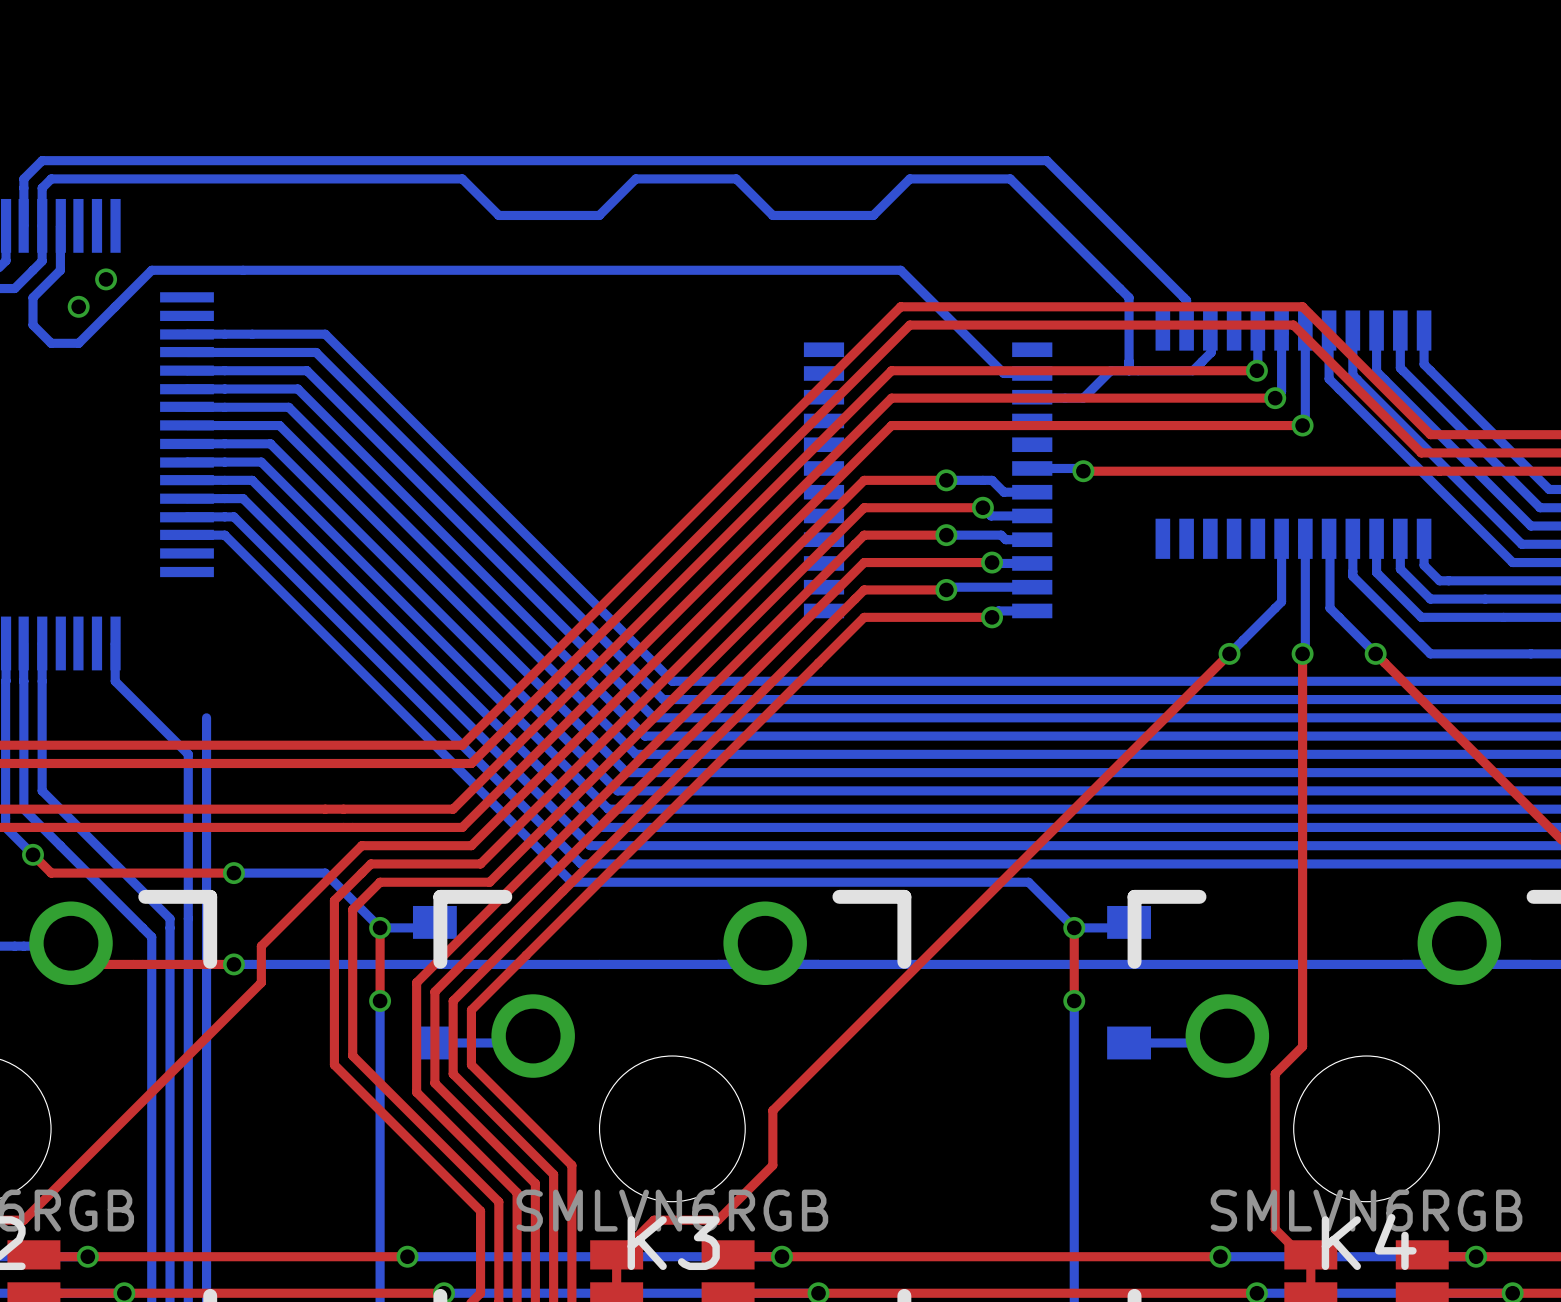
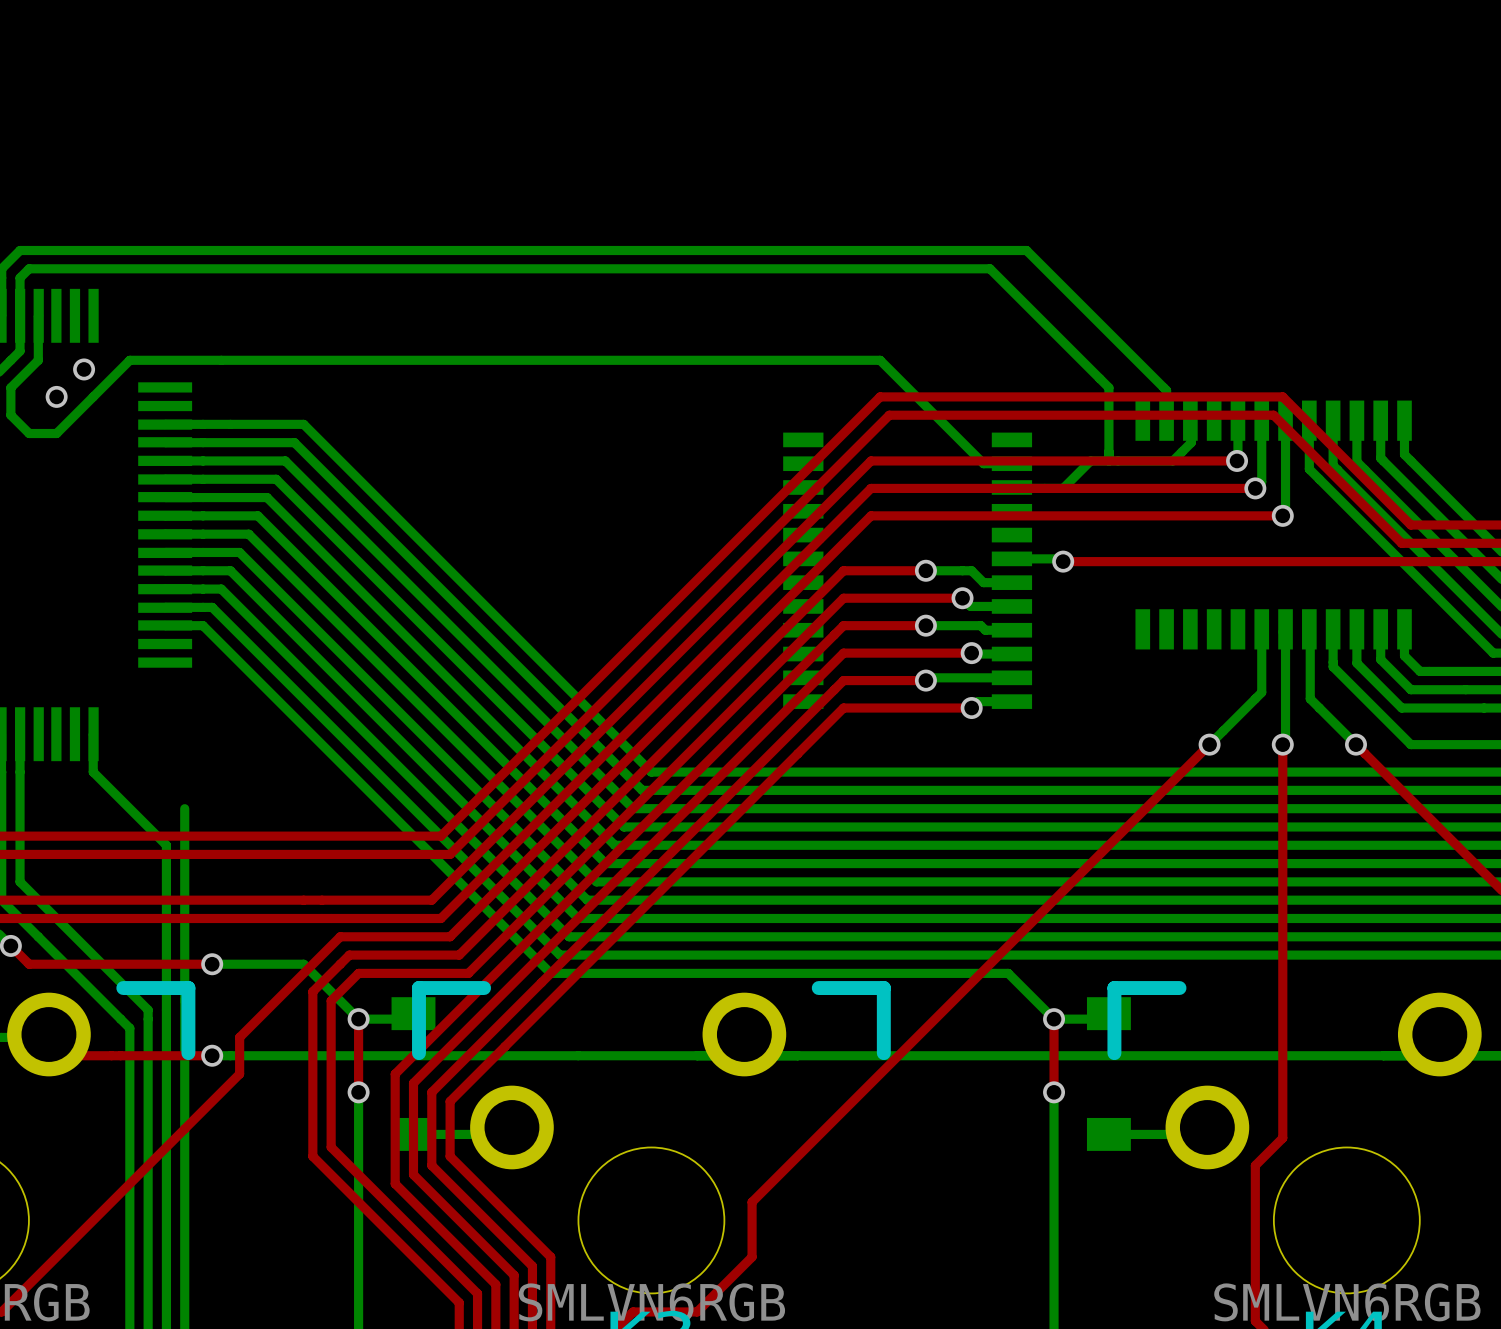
bottom track: (462, 178) (498, 215) (599, 215) (635, 178) -> (440, 268) (614, 268)
bottom track: (736, 178) (772, 215) (873, 215) (909, 178) -> (715, 268) (889, 268)

